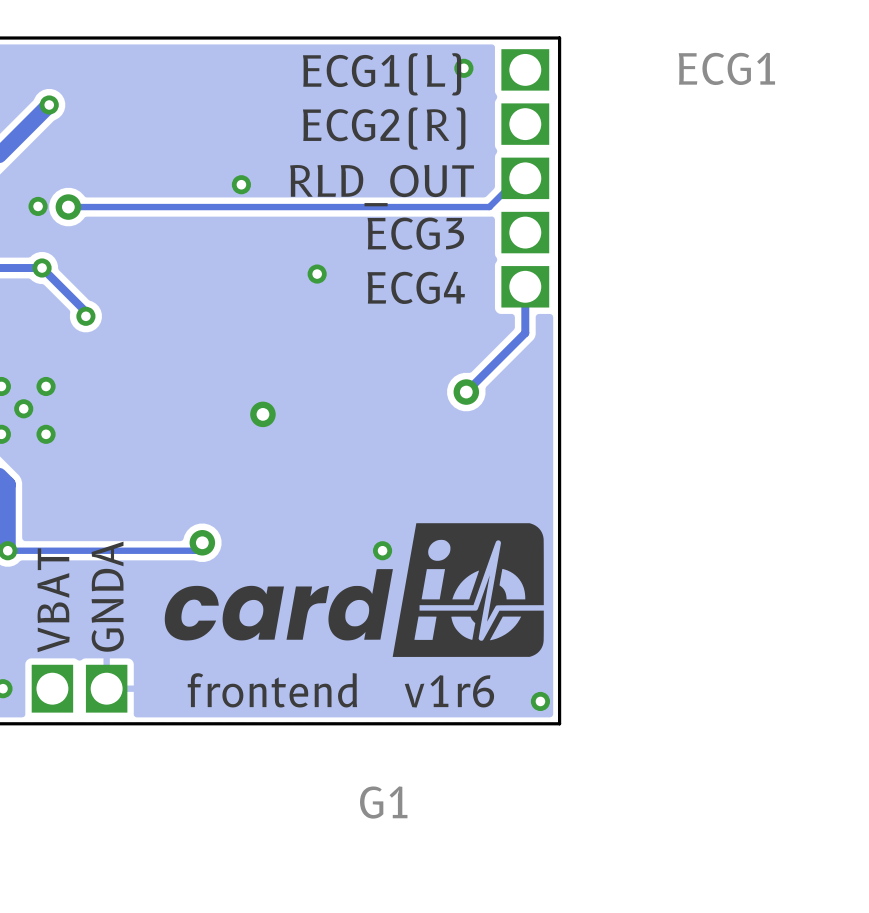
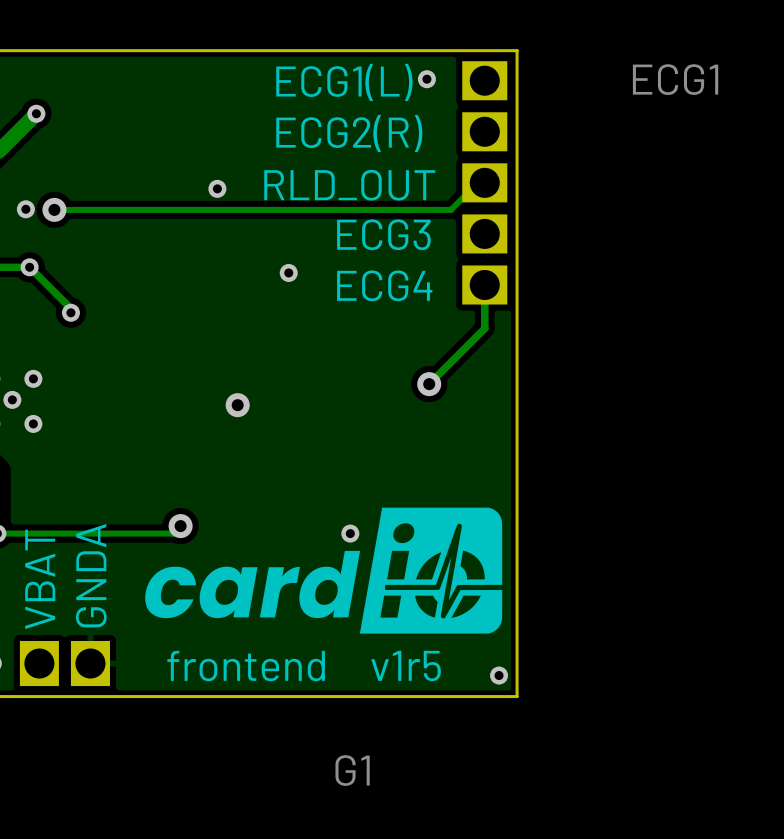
text: v1r6 (449, 691) -> v1r5 (406, 666)

